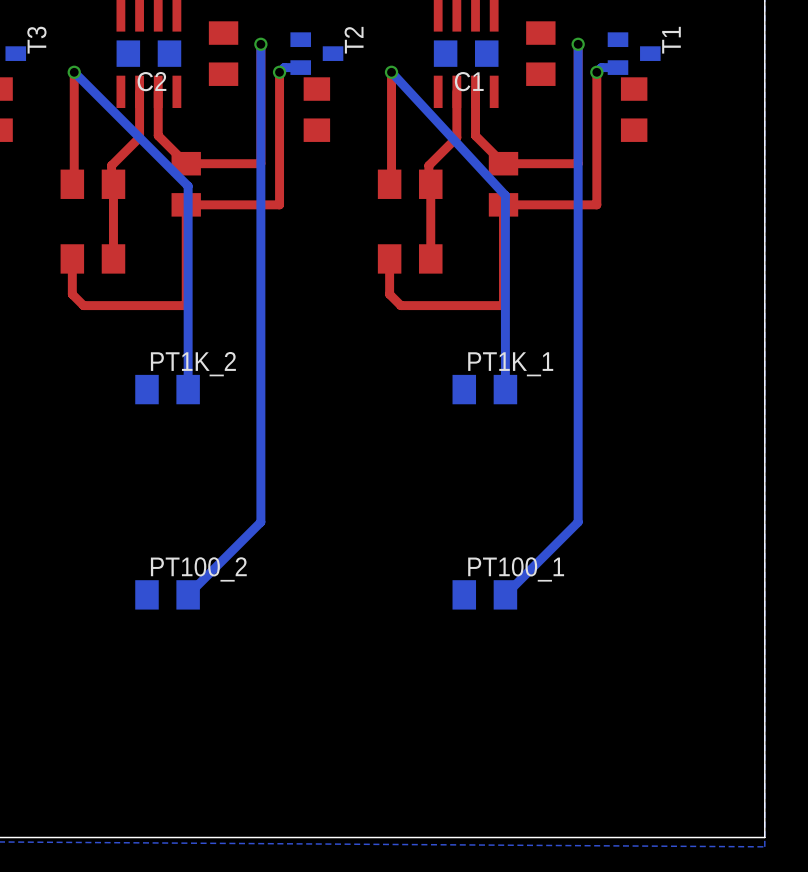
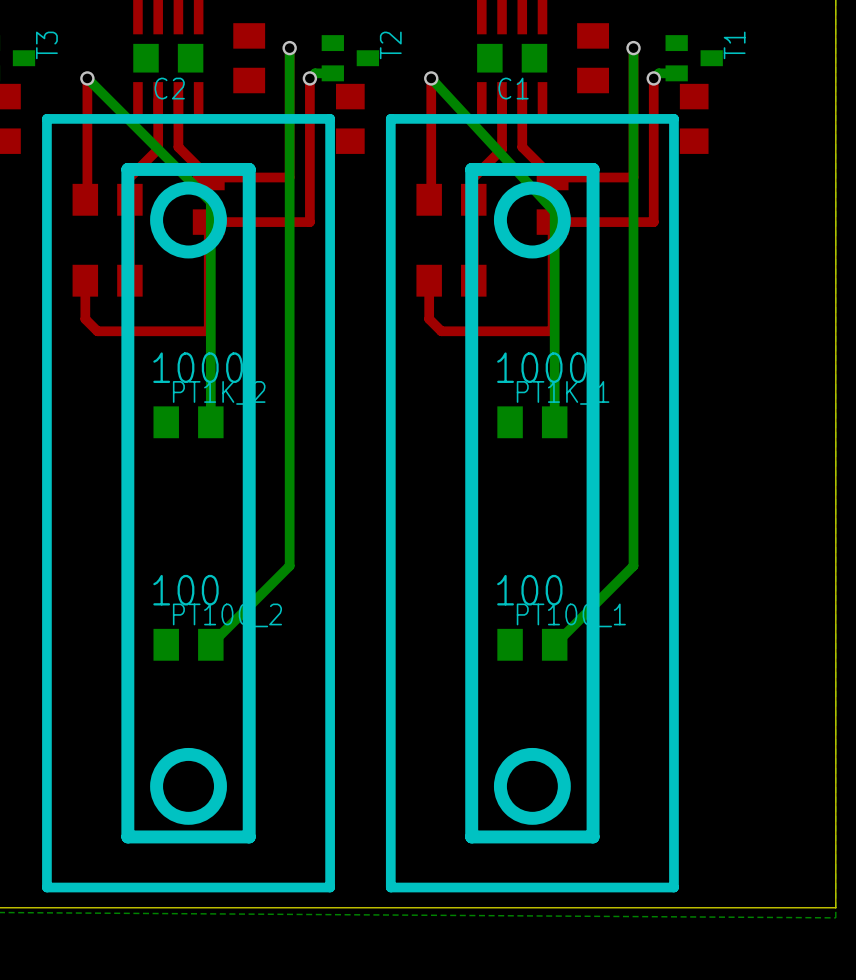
line: none -> (330, 118) (46, 118) (46, 887) (330, 887) (330, 118)
line: none -> (673, 118) (390, 118) (390, 887) (673, 887) (673, 118)
line: none -> (249, 169) (249, 836) (127, 836) (127, 169) (249, 169)
line: none -> (593, 169) (471, 169) (471, 836) (593, 836) (593, 169)
drawing: none -> [150, 181, 227, 259]
drawing: none -> [493, 181, 571, 259]
text: none -> 1000 (198, 367)
text: none -> 1000 (541, 367)
text: none -> 100 (185, 590)
text: none -> 100 (529, 590)
drawing: none -> [150, 747, 227, 825]
drawing: none -> [493, 747, 571, 825]

